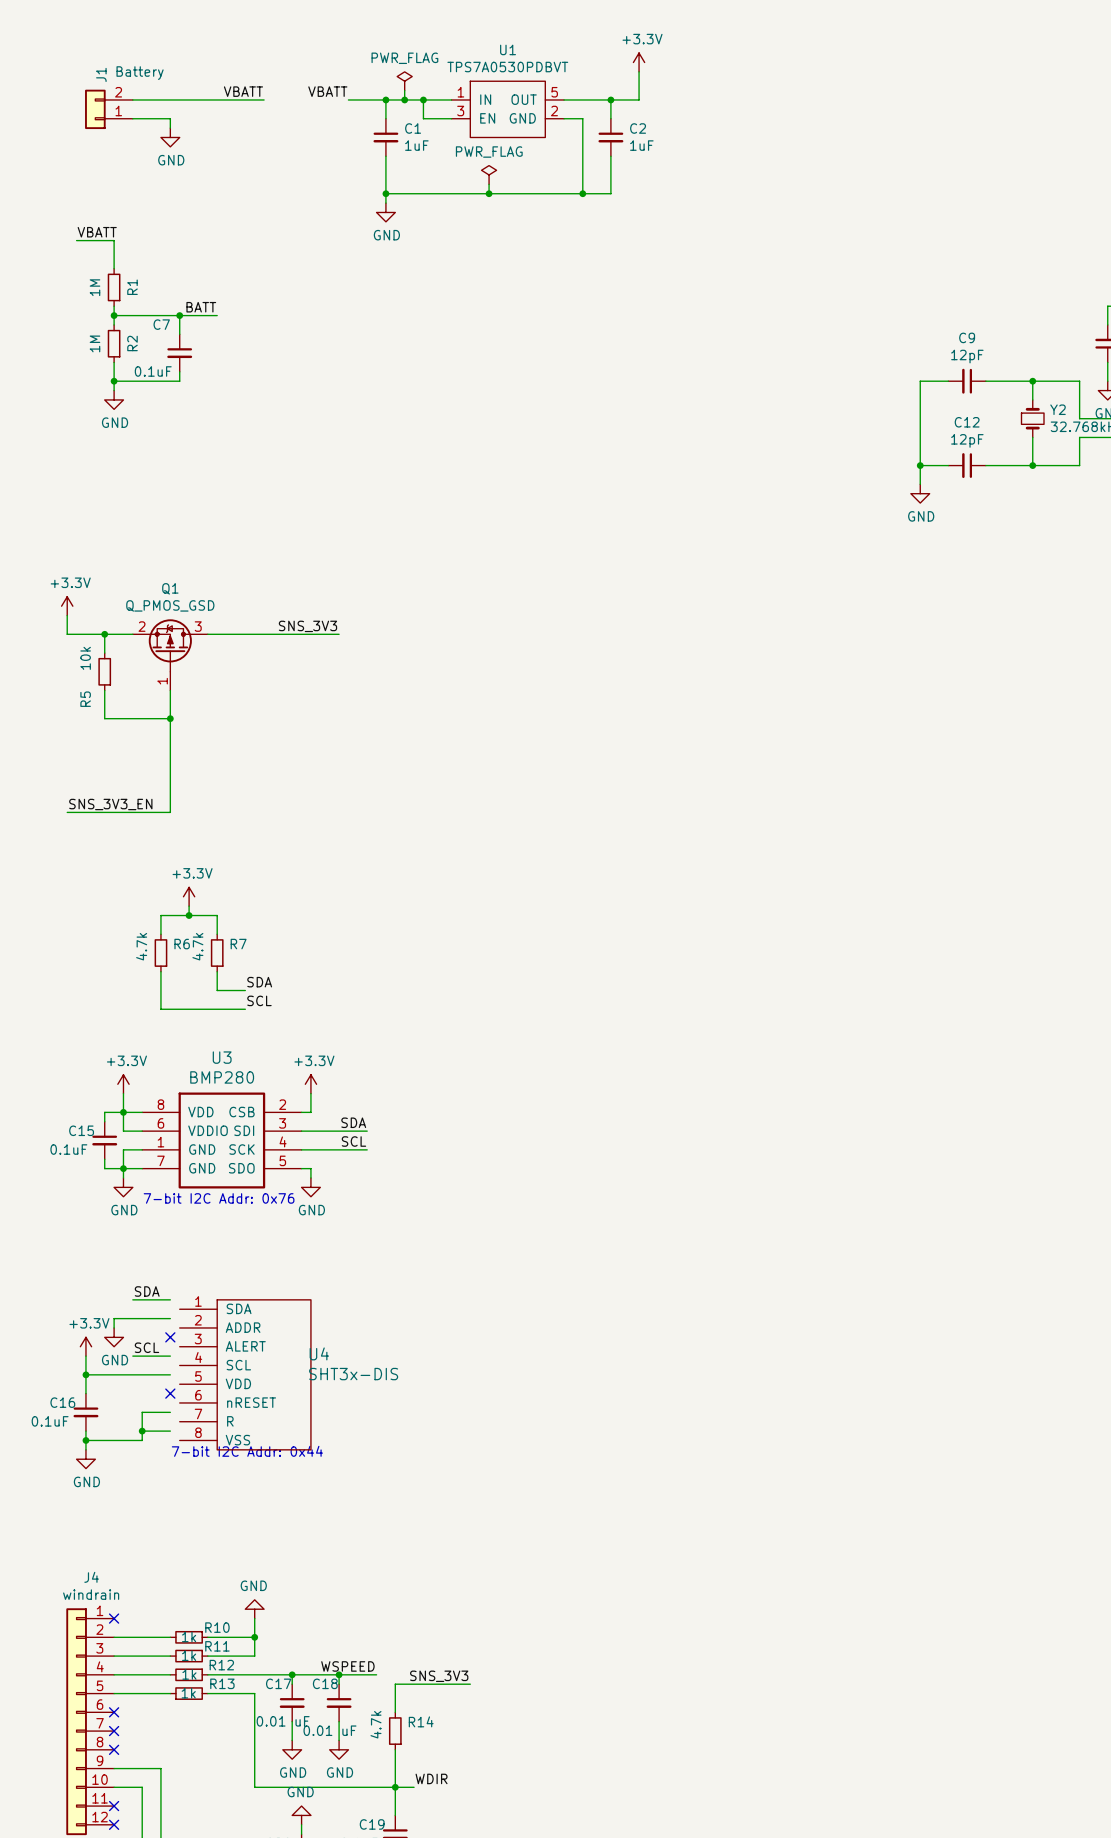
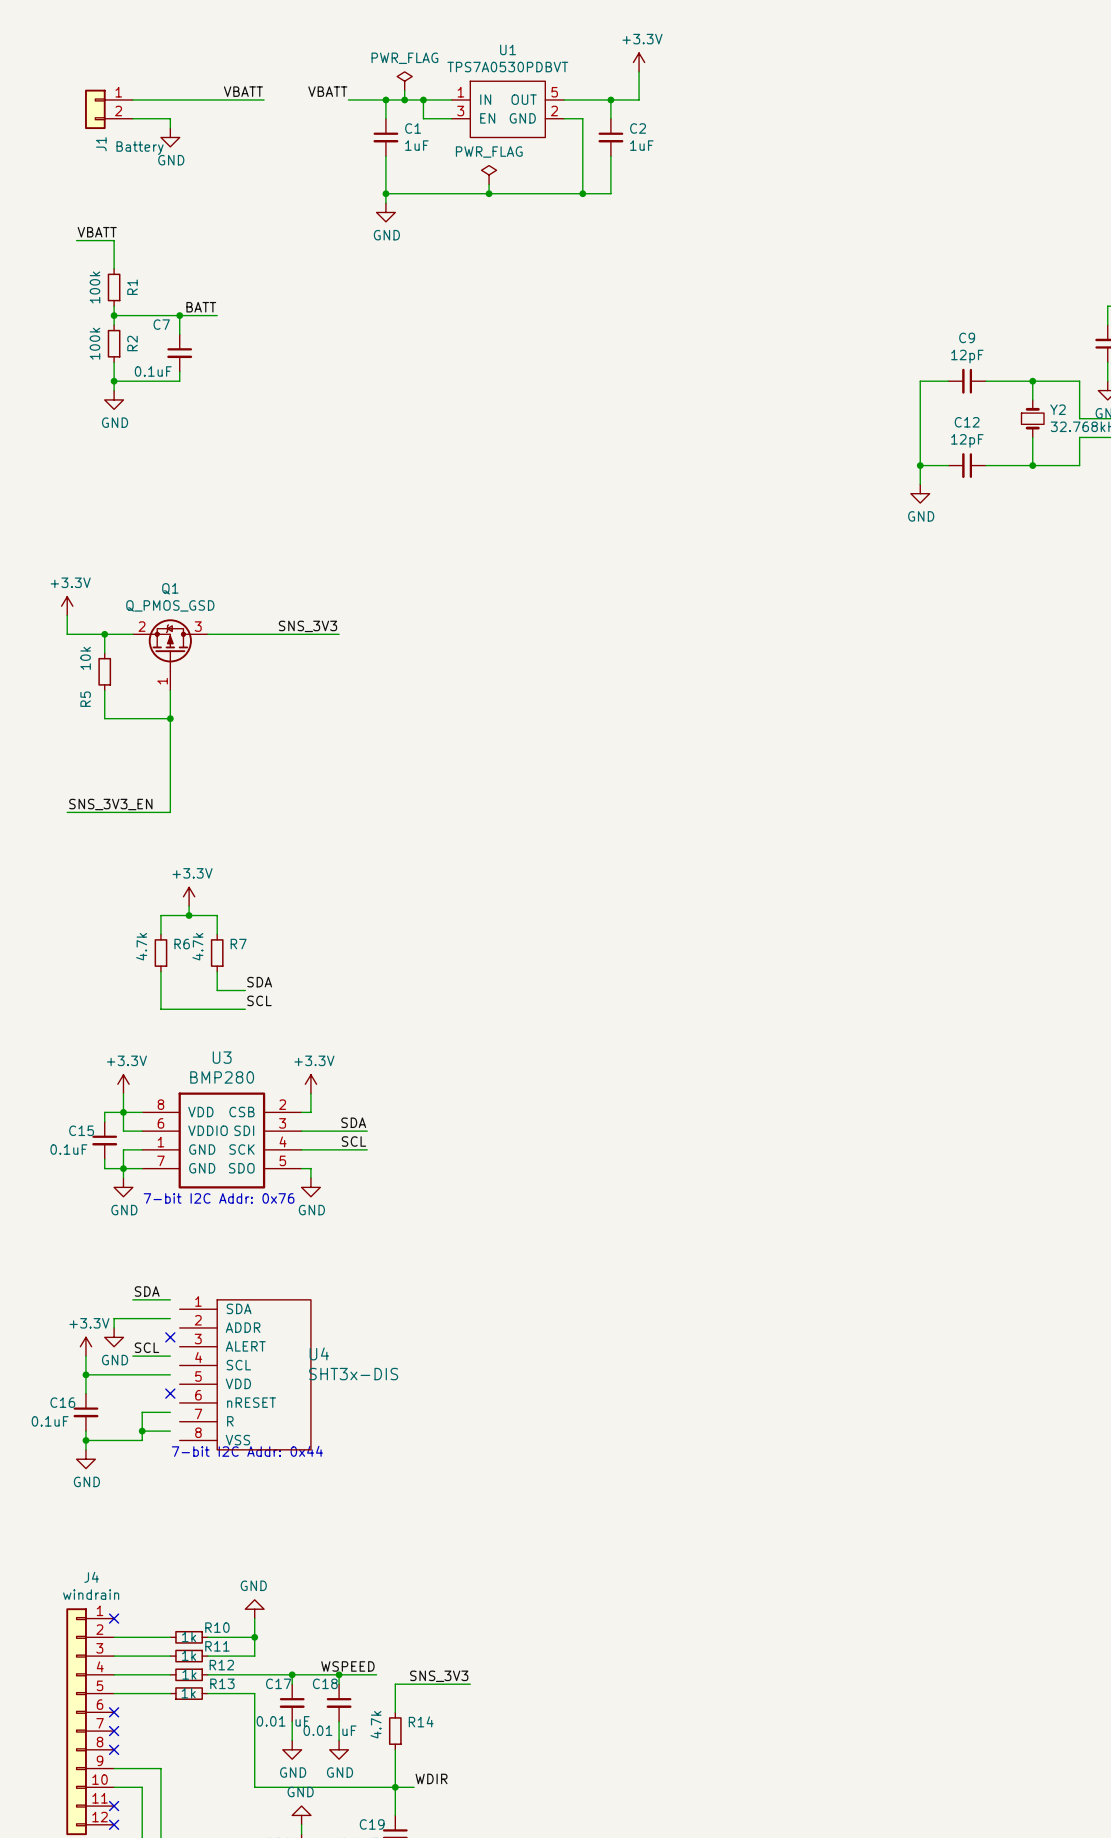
J1 flip: as is (95, 109) -> up-down (95, 109)
R1 value: 1M (94, 287) -> 100k (94, 287)
R2 value: 1M (94, 343) -> 100k (94, 343)

